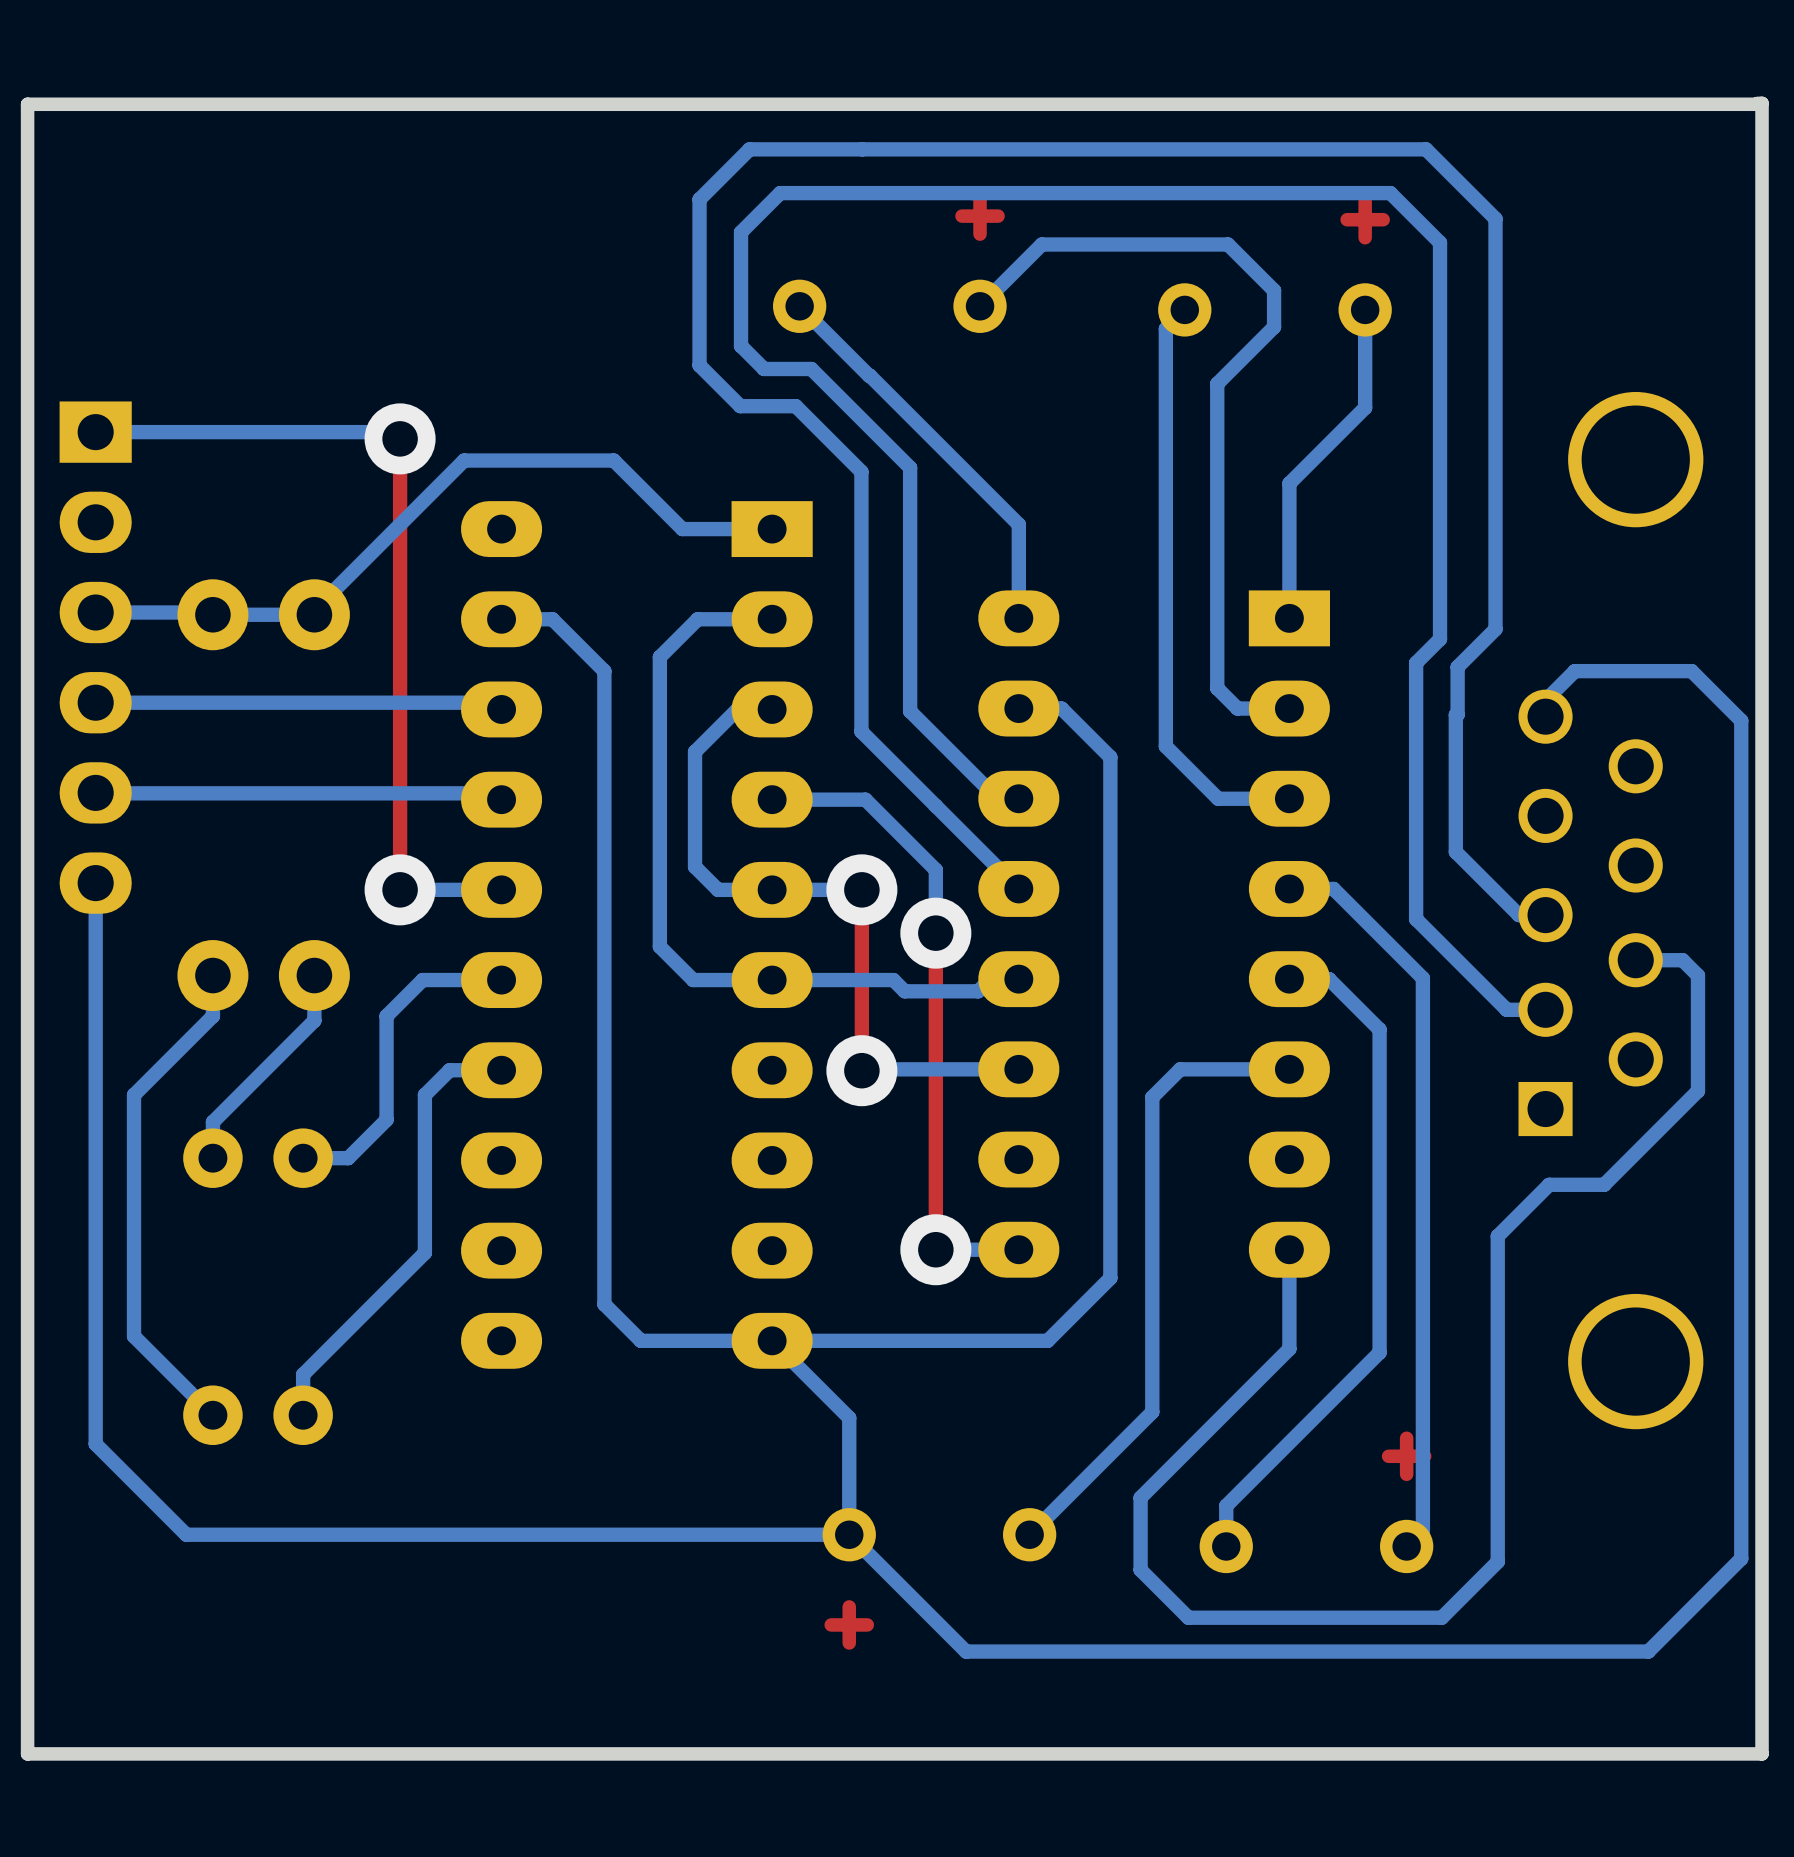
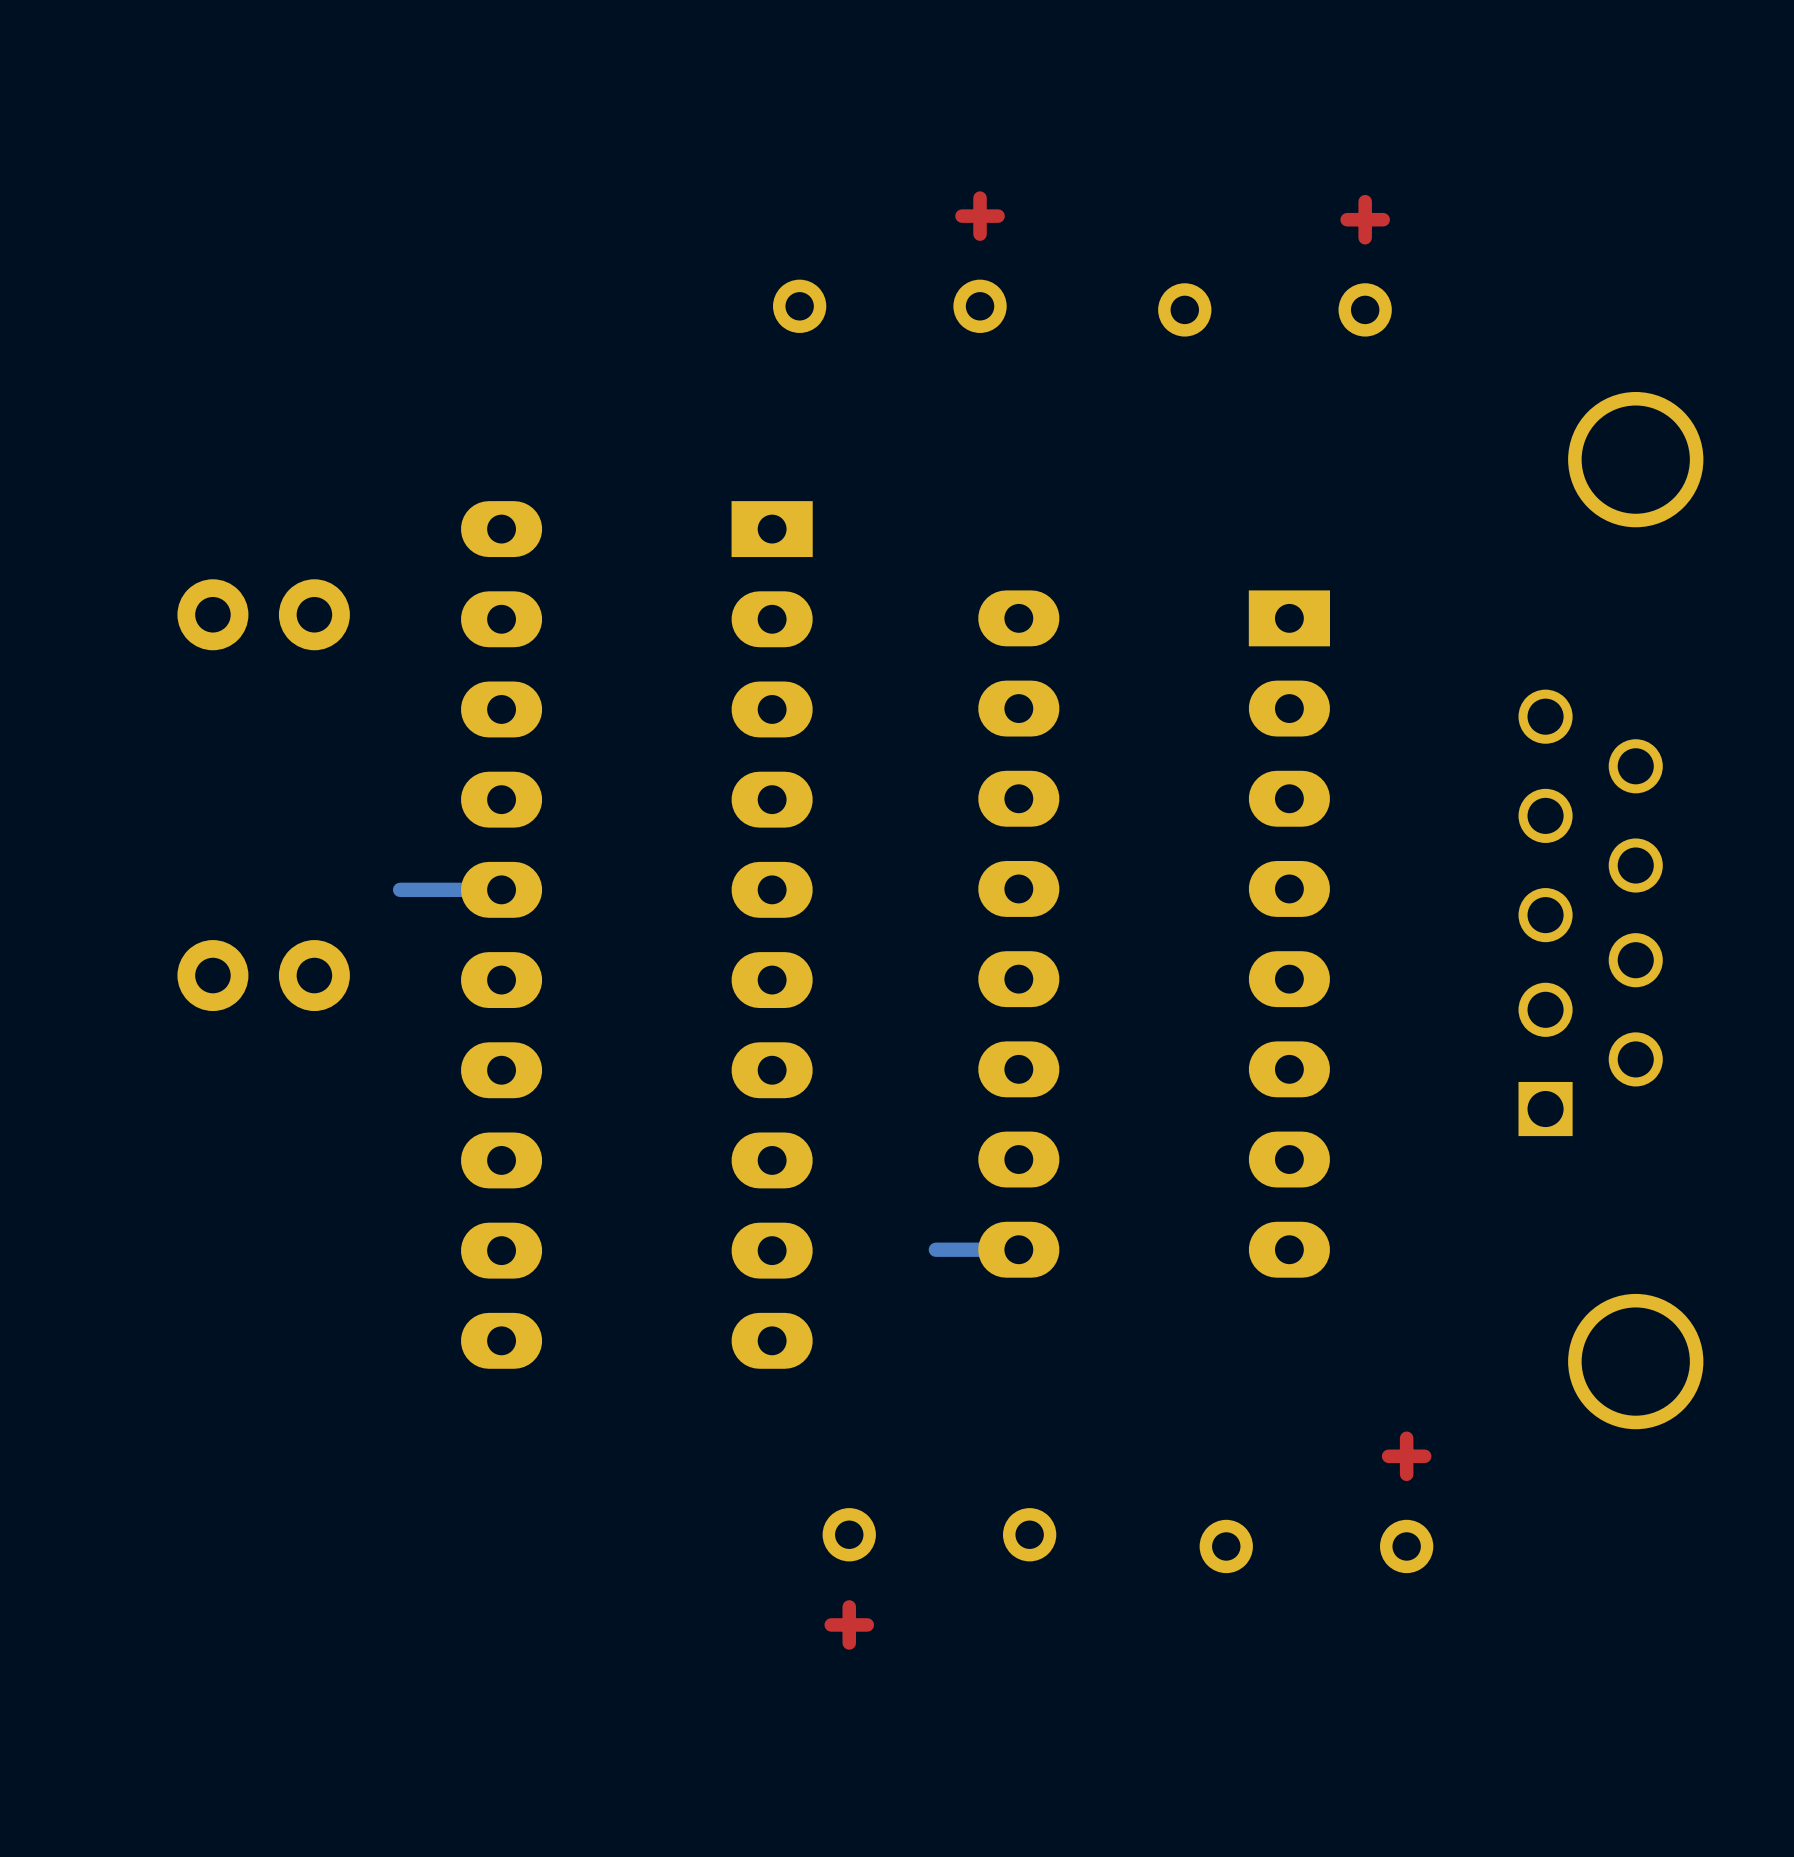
board edge: (1757, 103) (1762, 103) (1762, 1753) (27, 1753) (27, 104) (1759, 104) -> none
bottom track: (799, 306) (1018, 524) (1018, 618) -> none
bottom track: (980, 306) (1041, 244) (1228, 244) (1274, 290) (1274, 327) (1217, 383) (1217, 688) (1237, 708) (1289, 708) -> none
bottom track: (1184, 309) (1165, 328) (1165, 746) (1218, 798) (1289, 798) (1293, 802) -> none
bottom track: (1365, 309) (1365, 407) (1289, 483) (1289, 618) -> none
bottom track: (95, 432) (393, 432) (400, 438) -> none
top track: (400, 438) (400, 889) -> none
via: (400, 438) -> none
bottom track: (772, 529) (682, 529) (613, 460) (464, 460) (314, 610) (314, 614) (95, 612) -> none
bottom track: (501, 619) (552, 619) (604, 671) (604, 1304) (640, 1340) (1047, 1340) (1110, 1278) (1110, 757) (1061, 708) (1018, 708) -> none
bottom track: (772, 619) (697, 619) (659, 657) (659, 946) (693, 980) (893, 980) (904, 991) (978, 991) (990, 979) (1018, 979) -> none
part: (95, 657) -> none
bottom track: (500, 702) (95, 702) -> none
bottom track: (772, 709) (737, 709) (695, 751) (695, 866) (718, 889) (861, 889) -> none
bottom track: (1545, 716) (1545, 700) (1574, 671) (1691, 671) (1741, 720) (1741, 1558) (1648, 1651) (966, 1651) (849, 1534) -> none
bottom track: (501, 793) (96, 793) -> none
bottom track: (1018, 798) (997, 798) (910, 711) (910, 467) (811, 368) (764, 368) (741, 345) (741, 232) (780, 193) (1390, 193) (1440, 242) (1440, 639) (1416, 663) (1416, 919) (1506, 1009) (1545, 1009) -> none
bottom track: (773, 801) (772, 799) (865, 799) (935, 870) (935, 933) -> none
bottom track: (95, 883) (95, 1444) (186, 1534) (849, 1534) -> none
bottom track: (1018, 888) (861, 731) (861, 471) (795, 406) (740, 406) (699, 365) (699, 199) (749, 149) (1426, 149) (1495, 218) (1495, 629) (1457, 667) (1455, 851) (1518, 915) (1545, 915) -> none
bottom track: (1289, 888) (1333, 888) (1422, 978) (1422, 1530) (1406, 1546) -> none
via: (400, 889) -> none
top track: (861, 889) (861, 1070) -> none
via: (861, 889) -> none
top track: (935, 933) (935, 1249) -> none
via: (935, 933) -> none
bottom track: (1635, 960) (1682, 960) (1697, 975) (1697, 1090) (1604, 1184) (1549, 1184) (1497, 1236) (1497, 1561) (1441, 1617) (1188, 1617) (1140, 1569) (1140, 1497) (1289, 1348) (1289, 1249) -> none
bottom track: (212, 975) (212, 1016) (134, 1095) (134, 1336) (212, 1415) -> none
bottom track: (314, 975) (314, 1020) (212, 1122) (212, 1158) -> none
bottom track: (1289, 979) (1329, 979) (1379, 1029) (1379, 1352) (1226, 1505) (1226, 1546) -> none
bottom track: (501, 980) (422, 980) (386, 1016) (386, 1119) (348, 1158) (303, 1158) -> none
bottom track: (1294, 1069) (1180, 1069) (1152, 1097) (1152, 1412) (1029, 1534) -> none
bottom track: (501, 1070) (449, 1070) (424, 1095) (424, 1252) (303, 1374) (303, 1415) -> none
bottom track: (861, 1070) (1018, 1069) (1017, 1071) -> none
via: (861, 1070) -> none
part: (258, 1158) -> none
via: (935, 1249) -> none
bottom track: (772, 1340) (849, 1417) (849, 1534) -> none
part: (258, 1415) -> none

